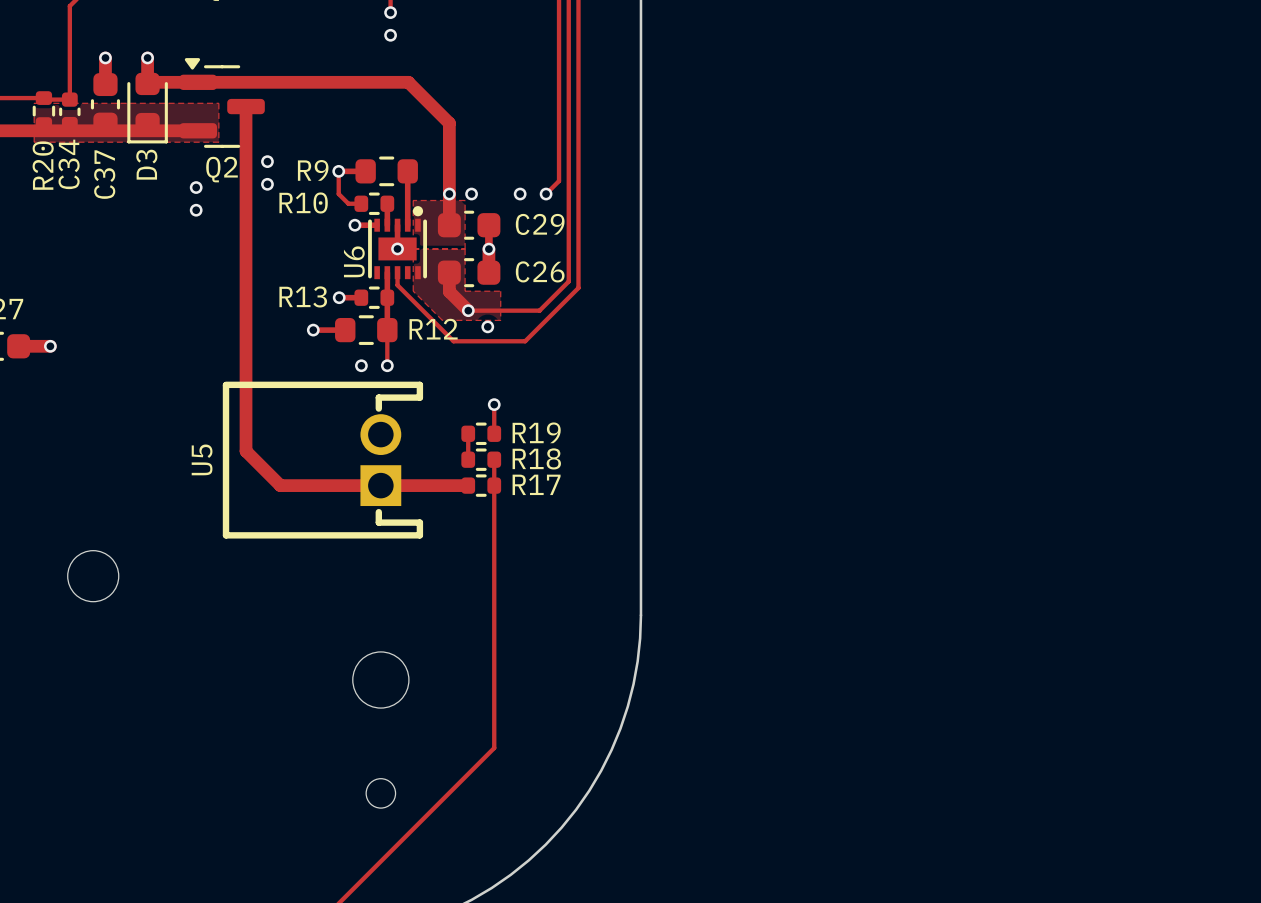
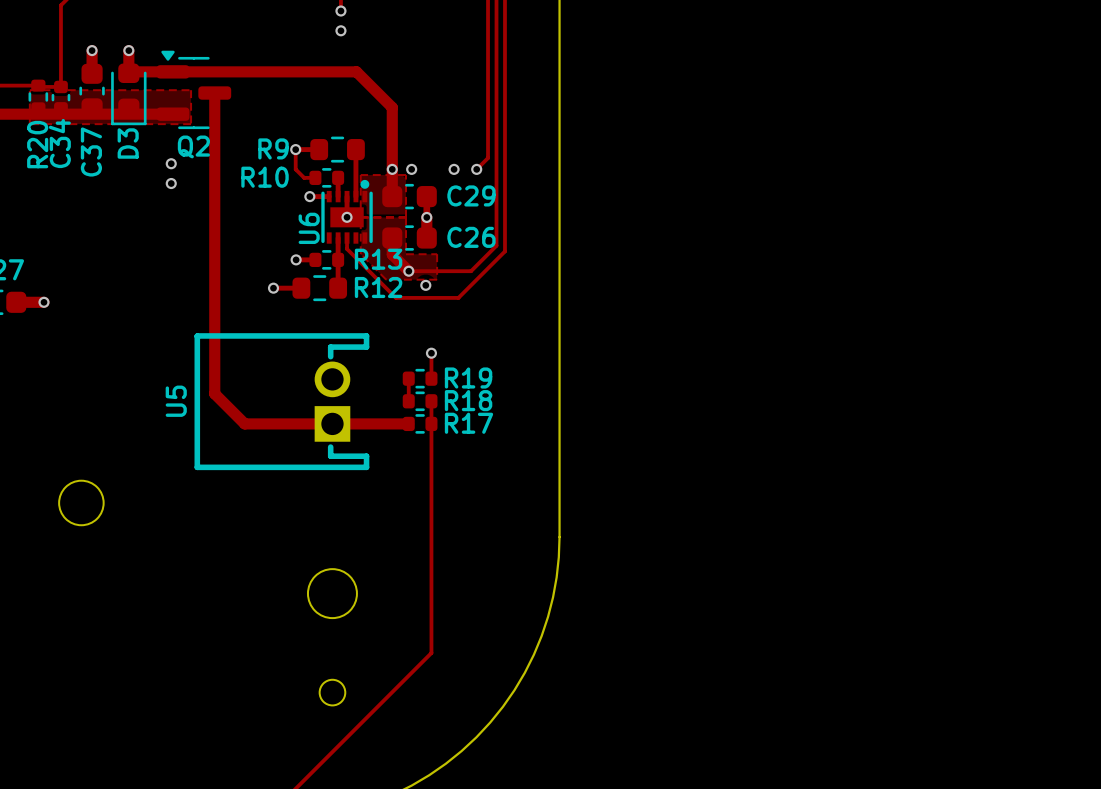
via: (267, 161) -> none
via: (267, 184) -> none
R13 name position: R13 (303, 296) -> R13 (378, 259)
track: (387, 330) (387, 365) -> none
via: (361, 365) -> none
via: (387, 365) -> none

